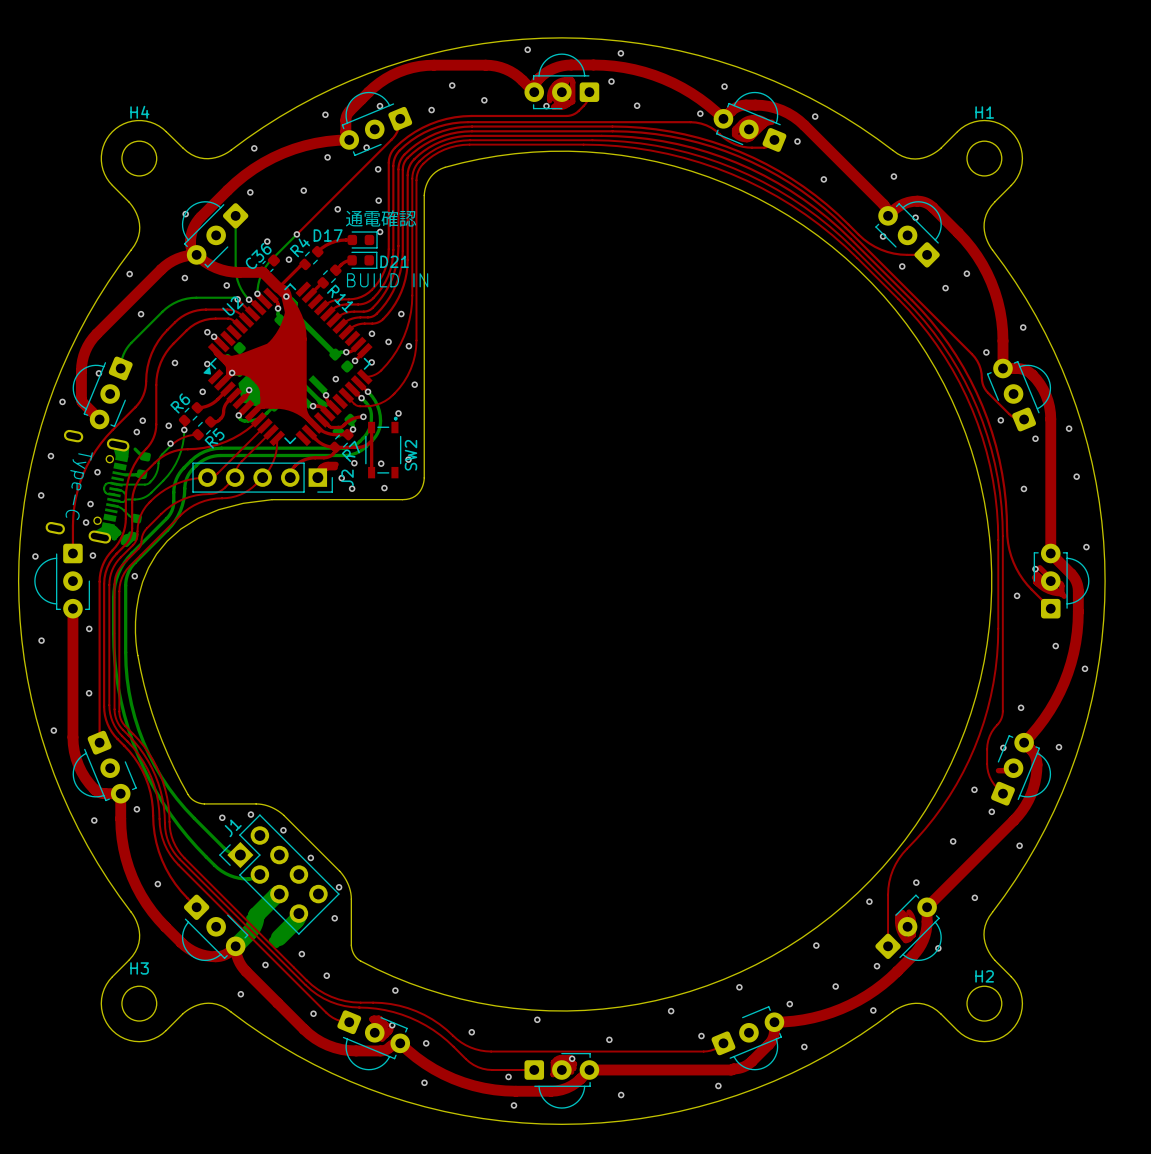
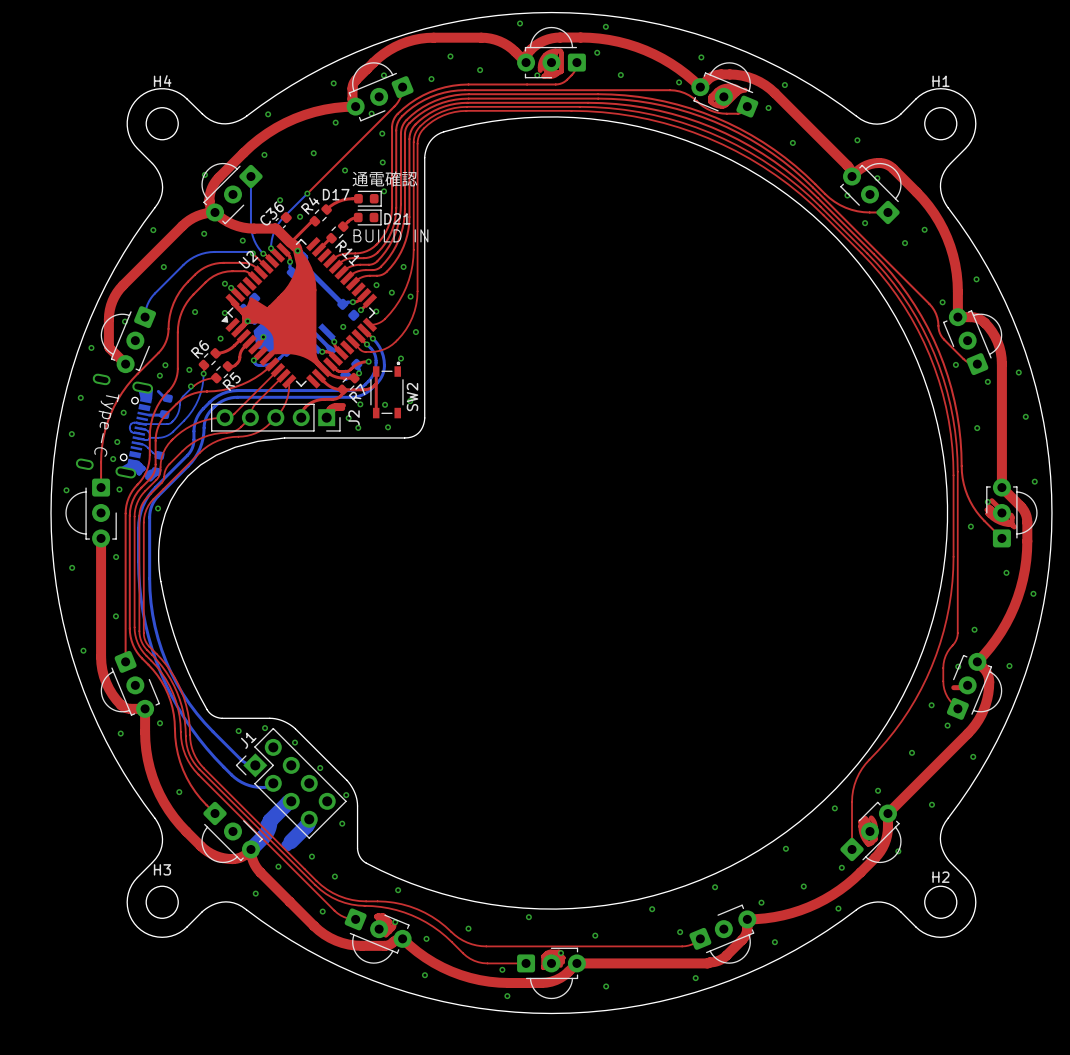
drawing shape: [217, 343, 270, 372] -> [239, 297, 269, 321]

